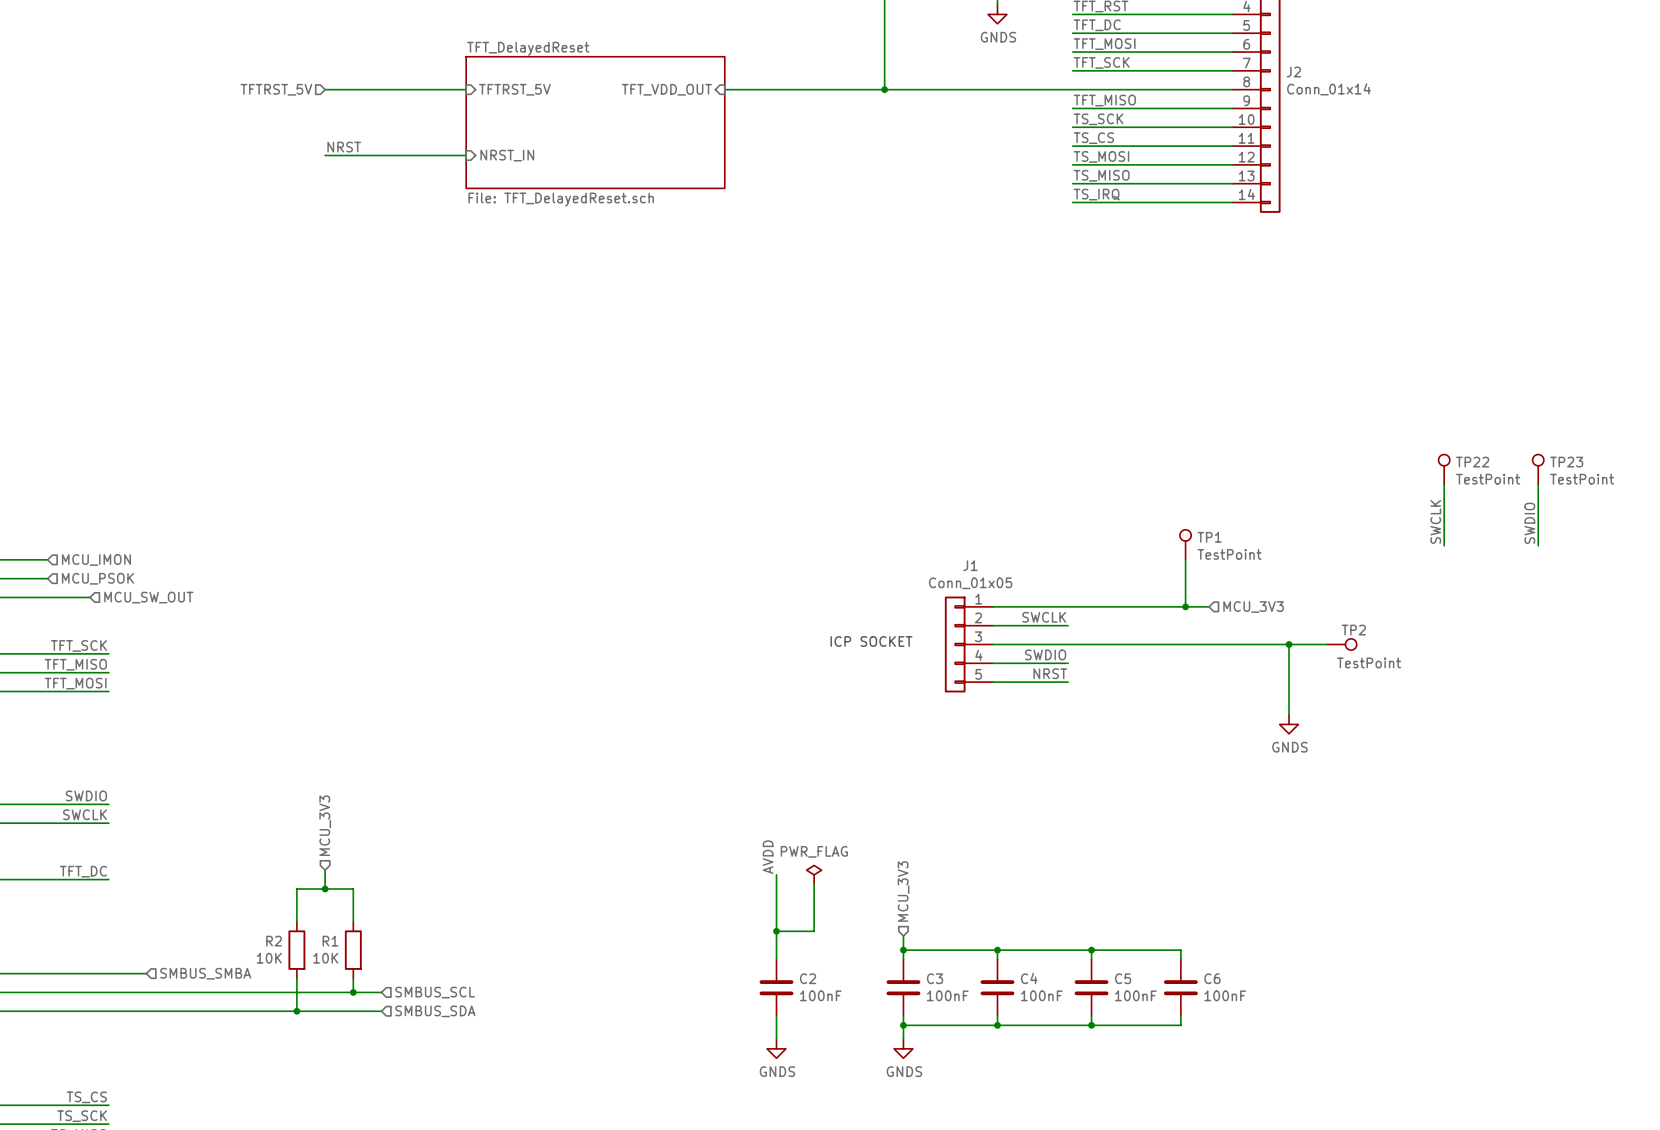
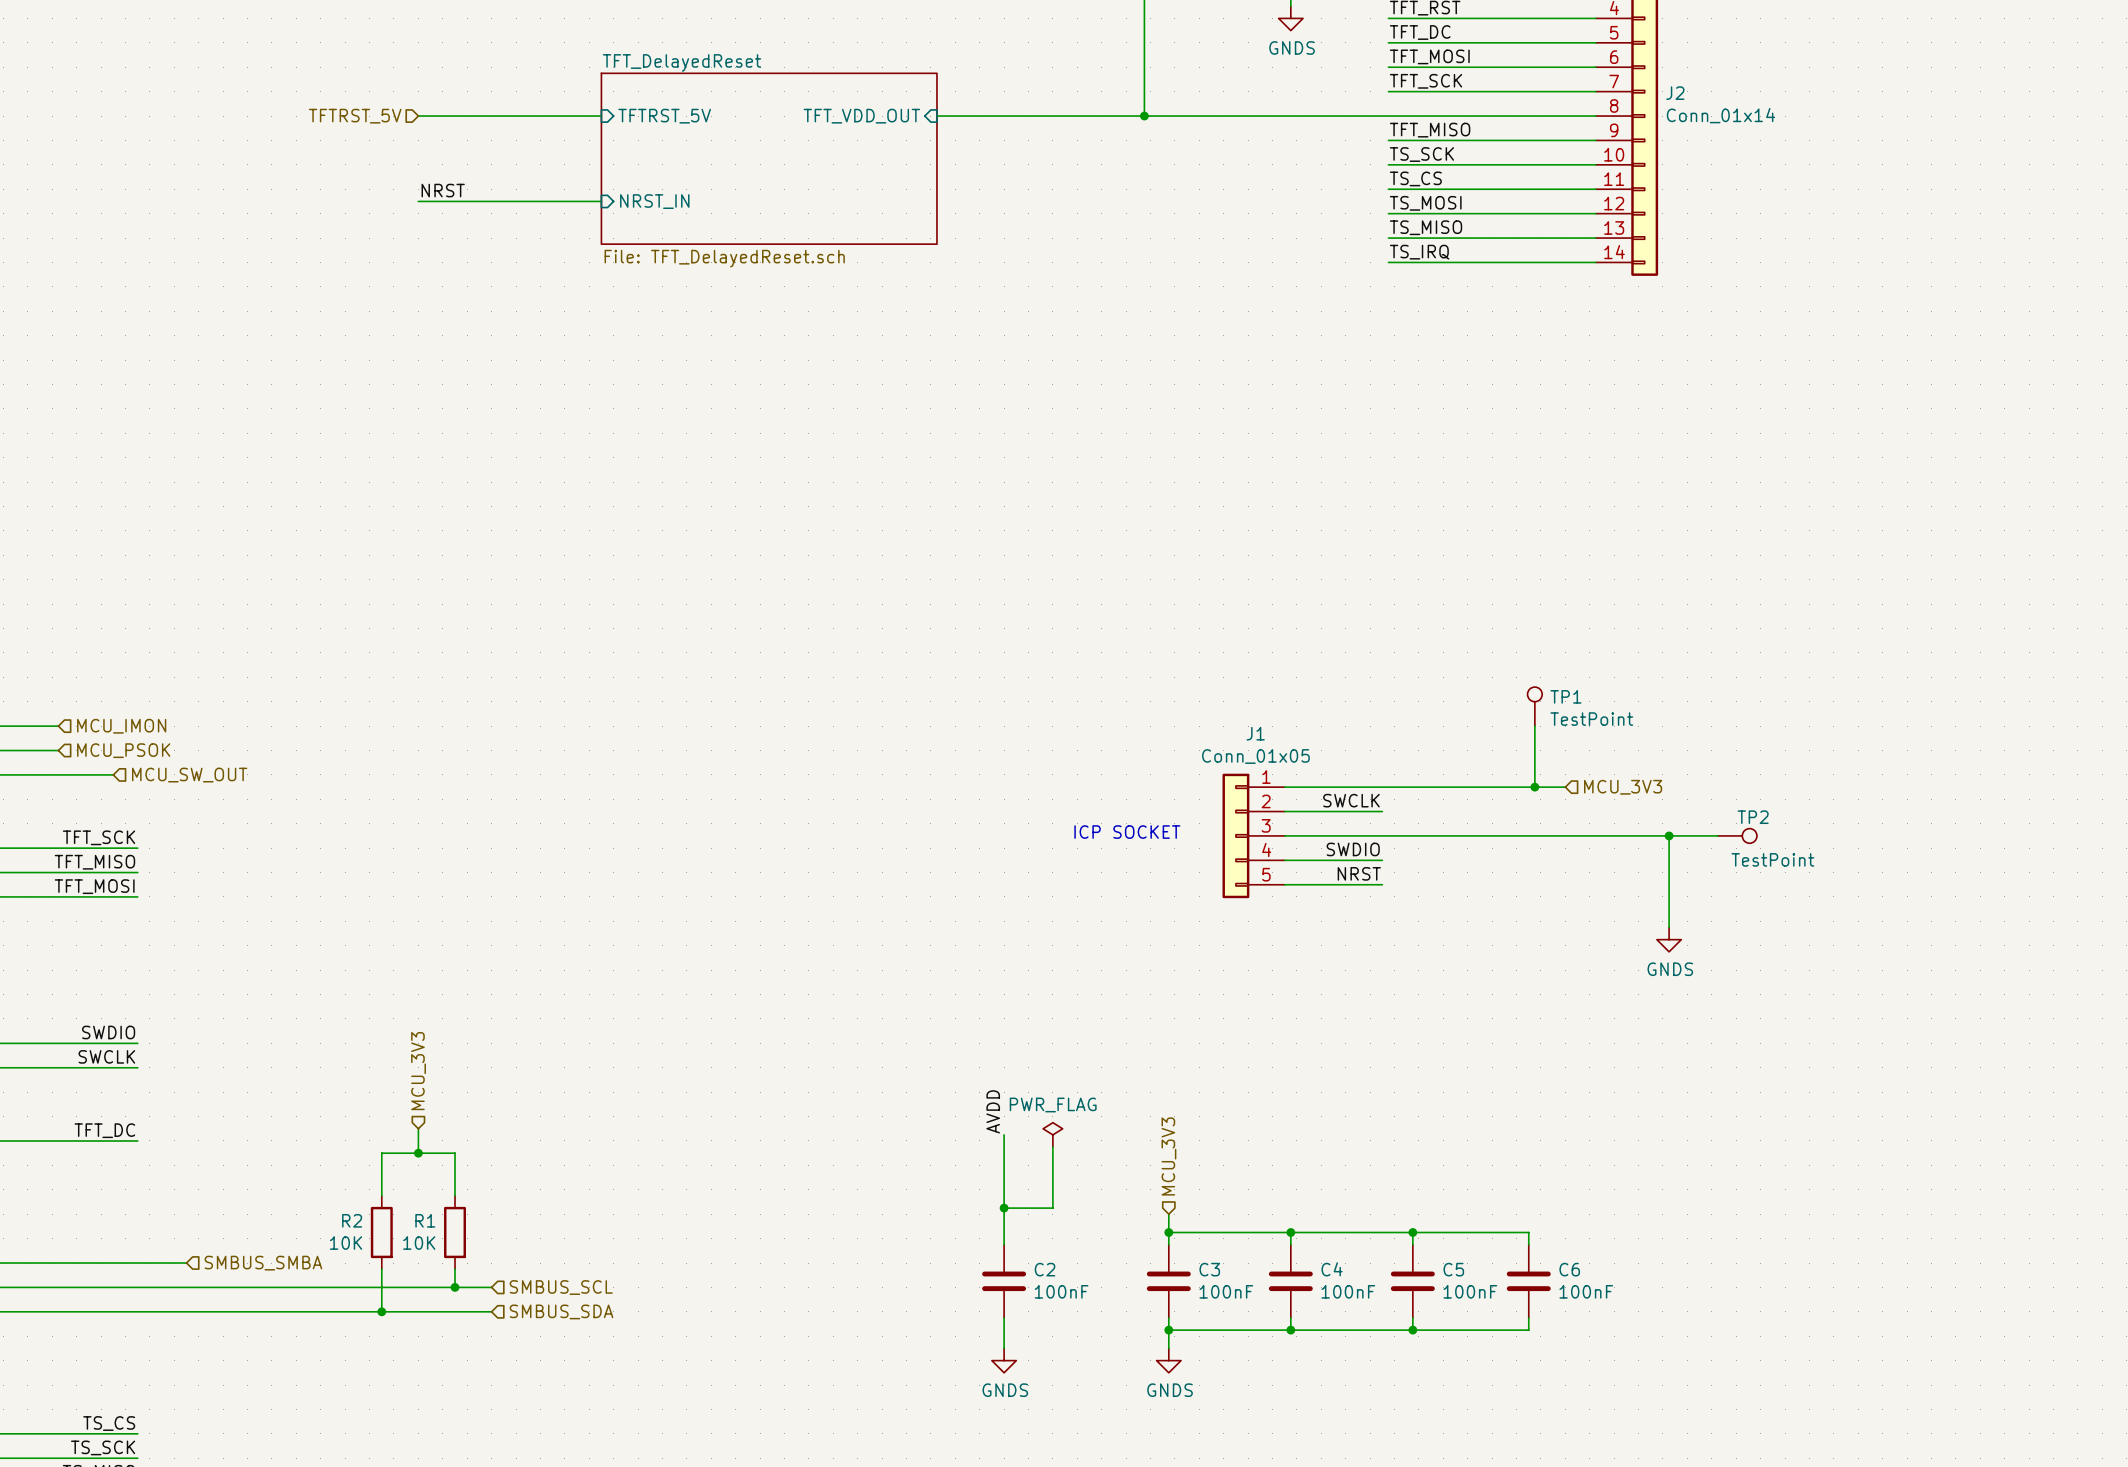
TP22: TestPoint (1444, 469) -> none
TP23: TestPoint (1538, 469) -> none
wire: (1444, 484) (1444, 545) -> none
wire: (1538, 484) (1538, 545) -> none
label: SWCLK (1435, 521) -> none
label: SWDIO (1529, 523) -> none

